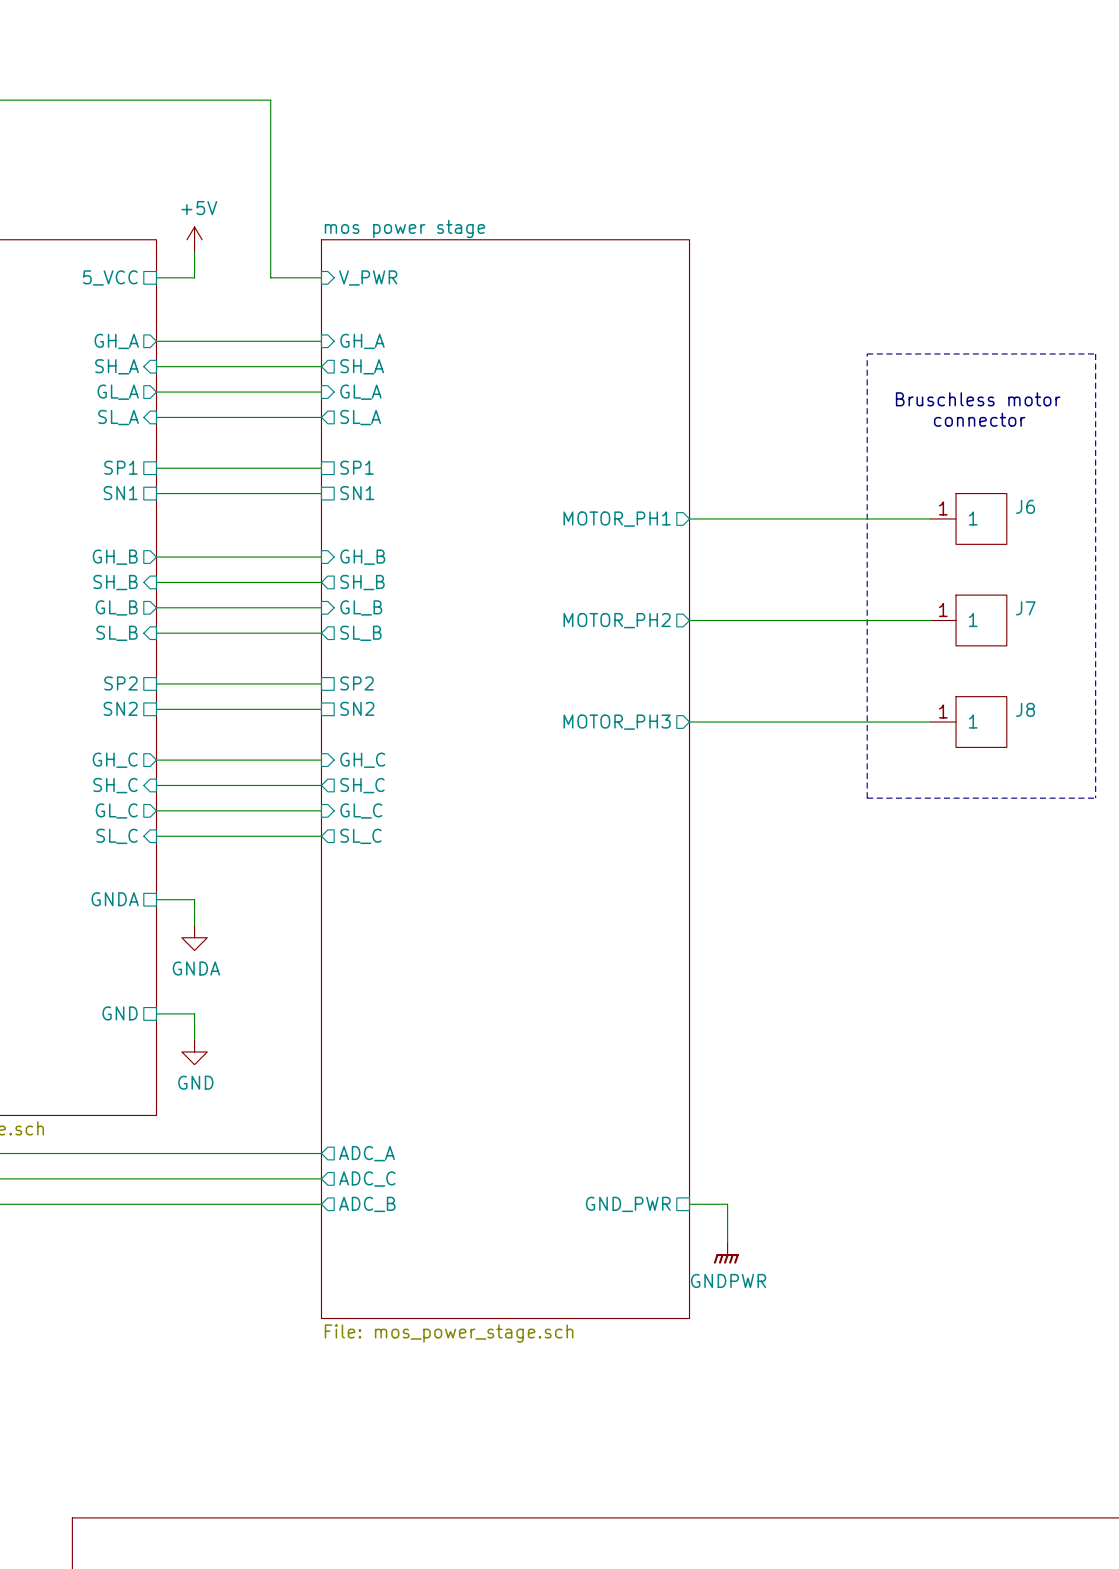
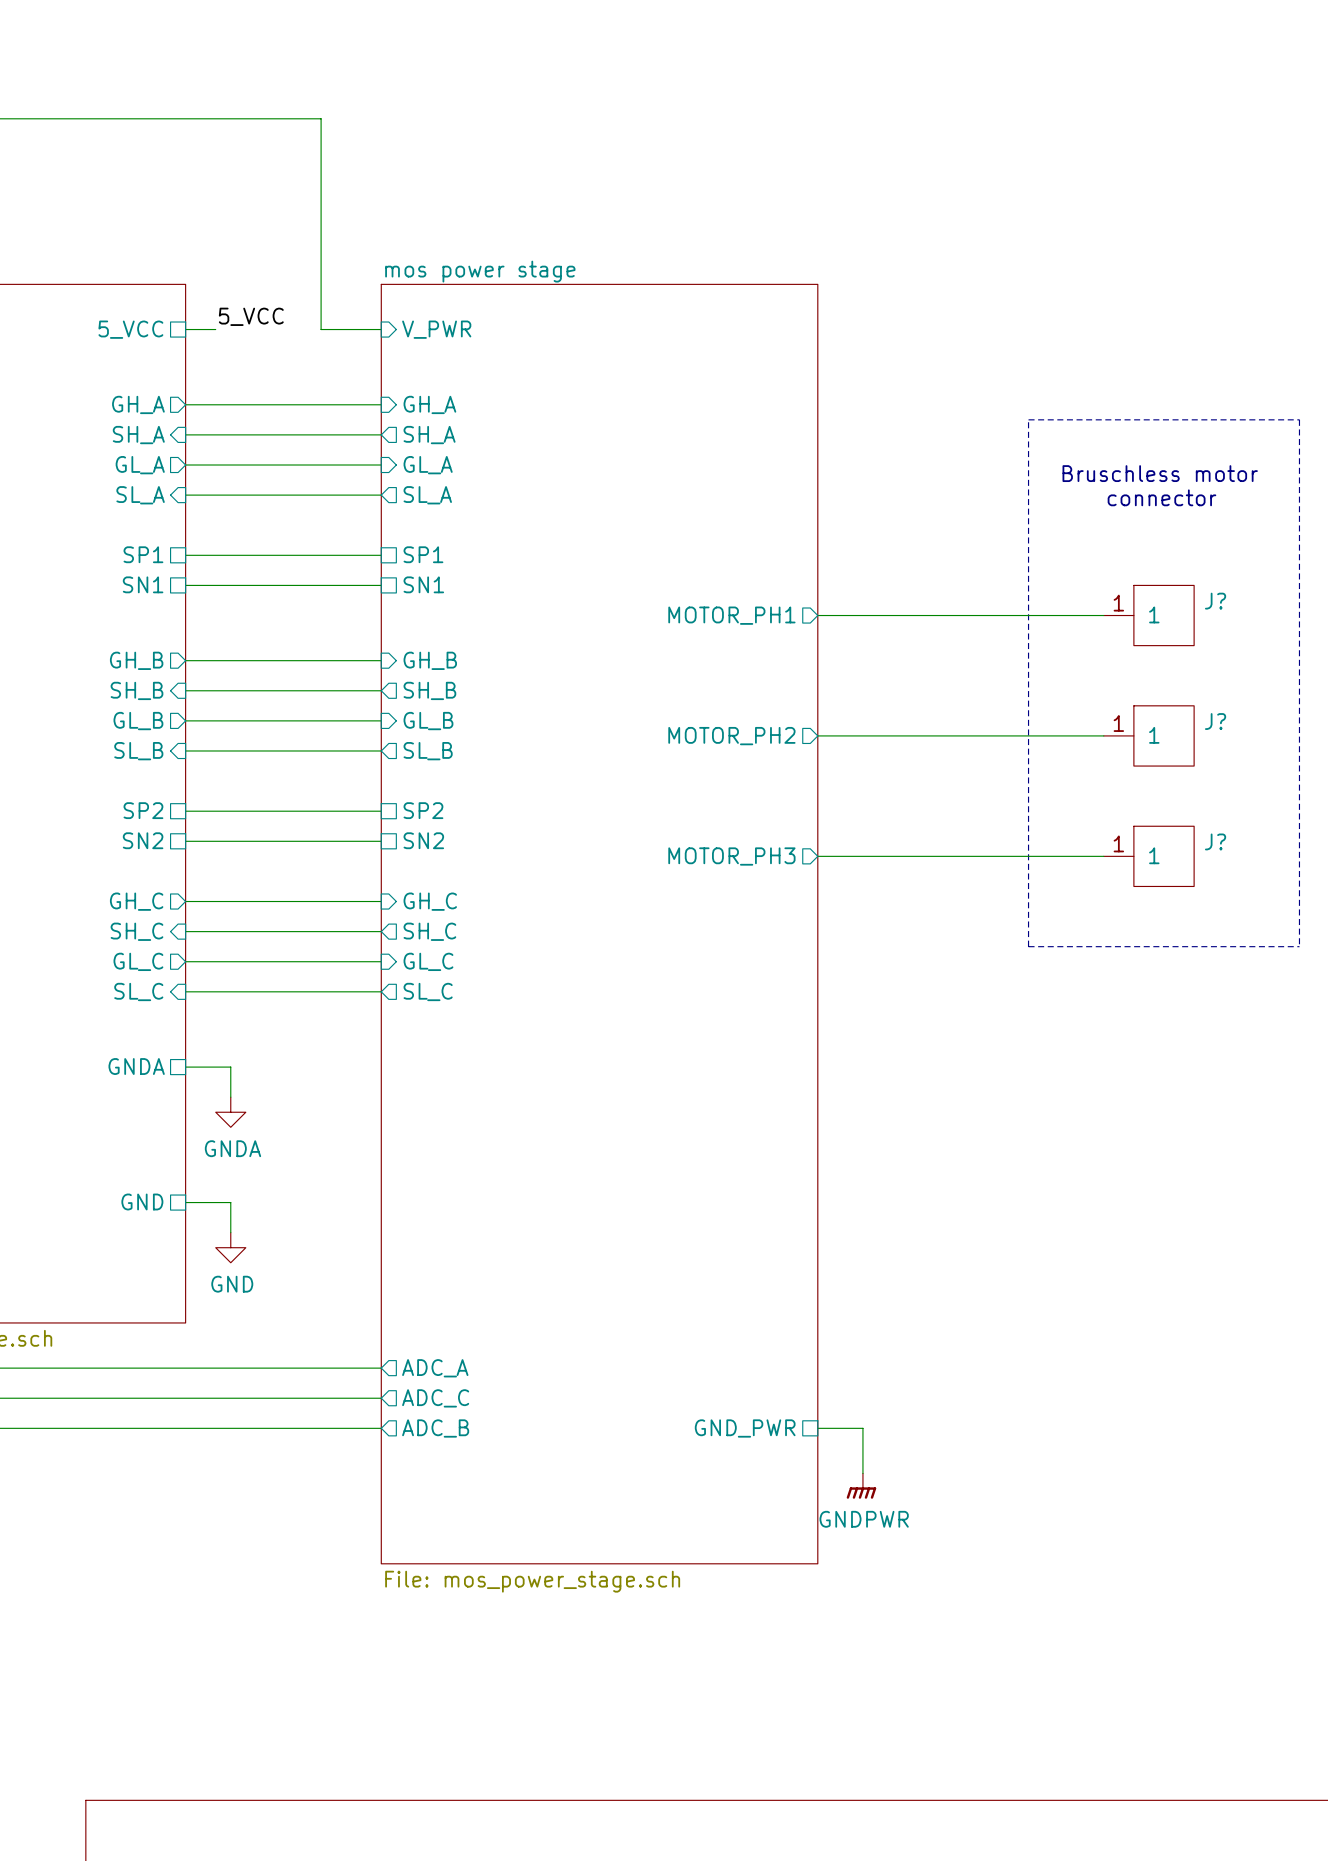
power symbol: +5V (194, 239) -> none
wire: (194, 252) (194, 277) (181, 277) -> none
label: none -> 5_VCC (251, 316)
J6 name: J6 (1025, 506) -> J? (1215, 601)
J7 name: J7 (1025, 608) -> J? (1215, 721)
J8 name: J8 (1025, 709) -> J? (1215, 841)

